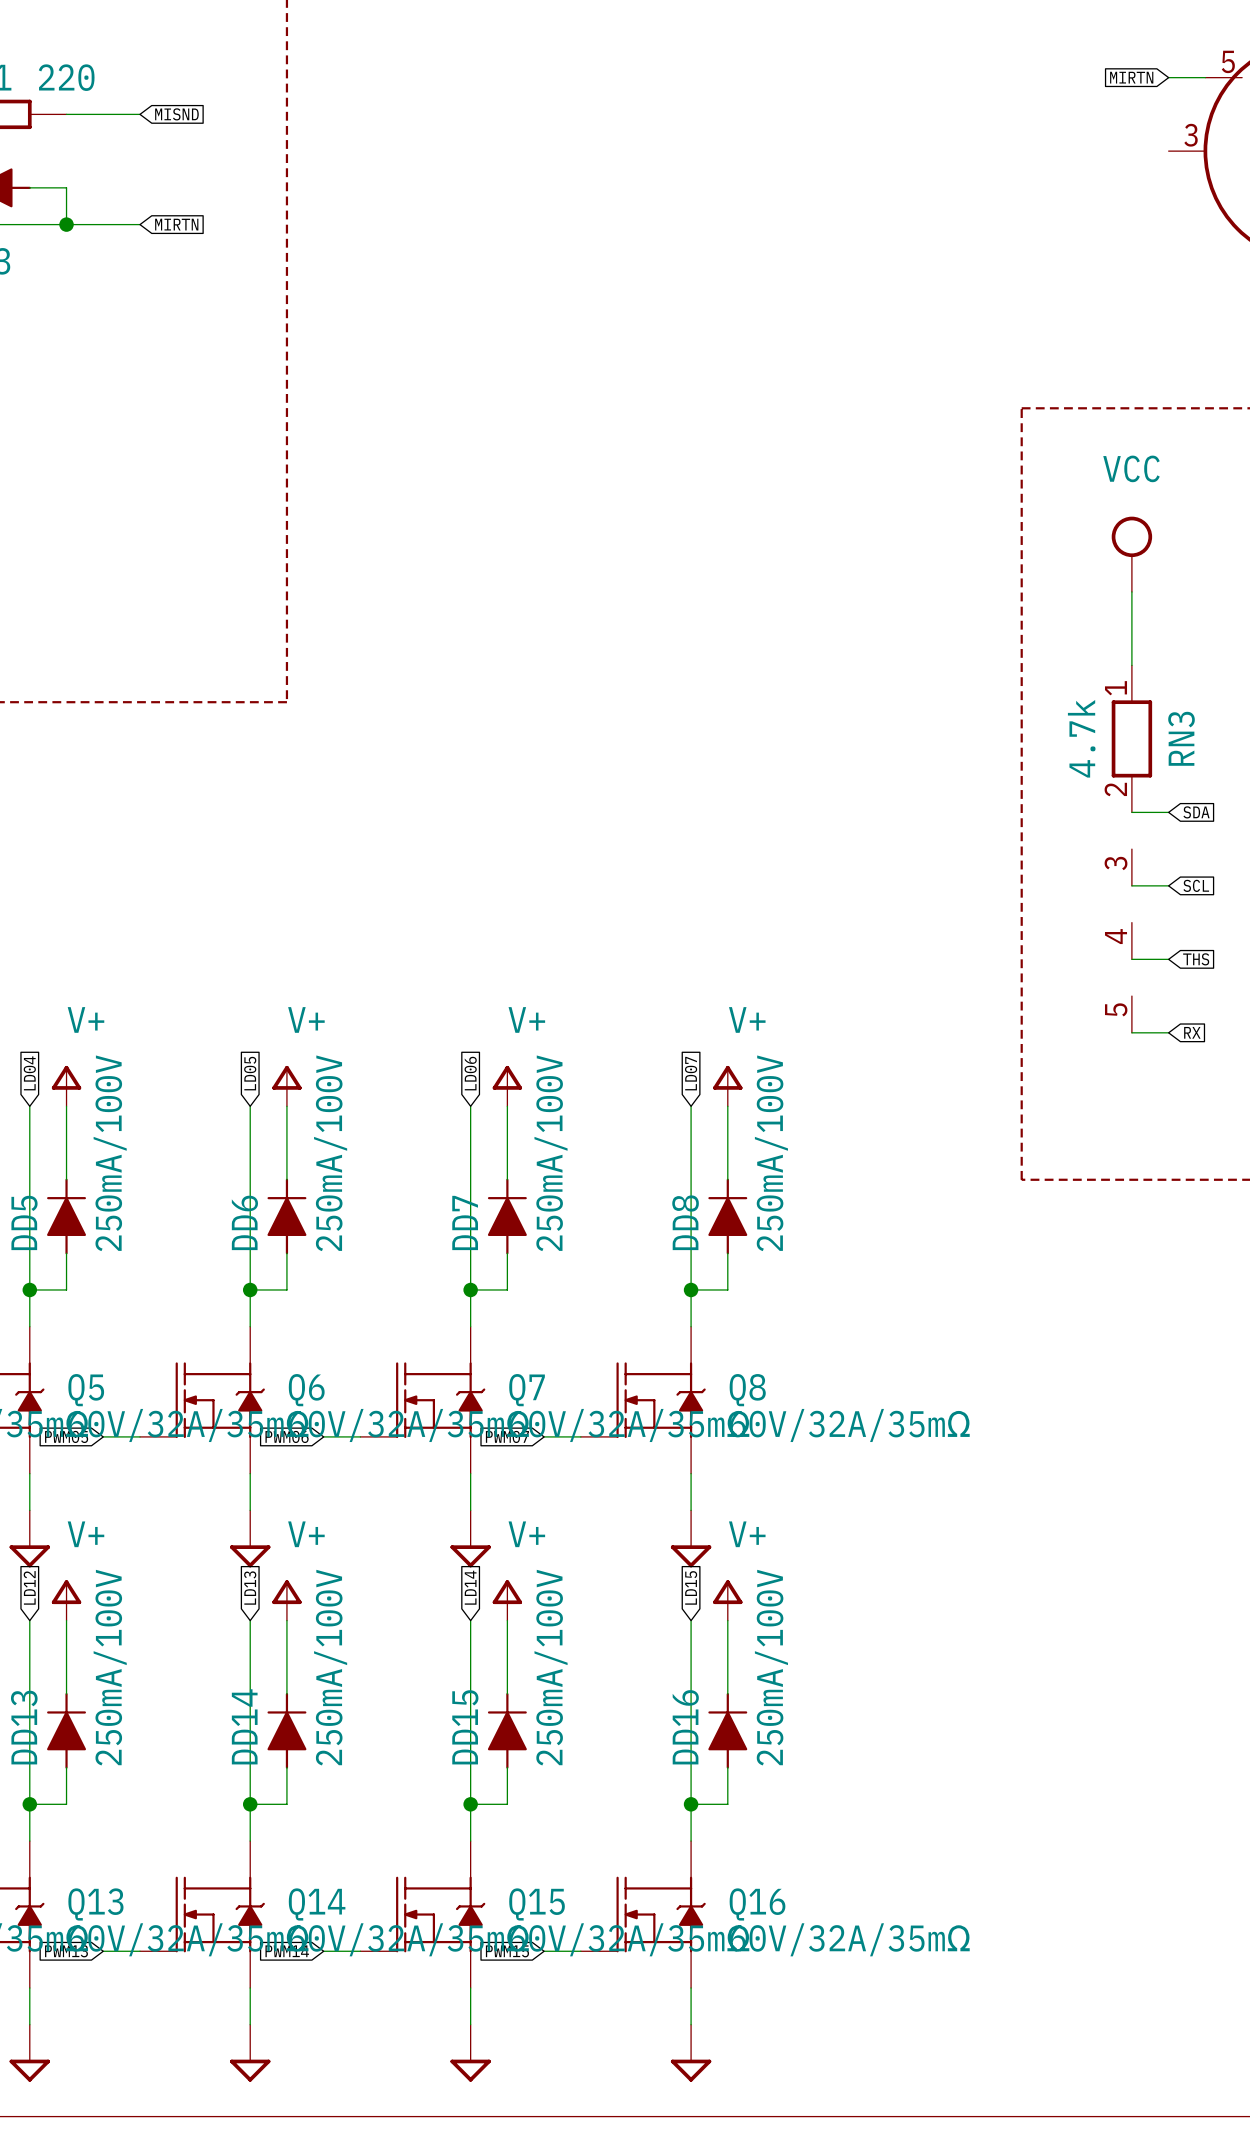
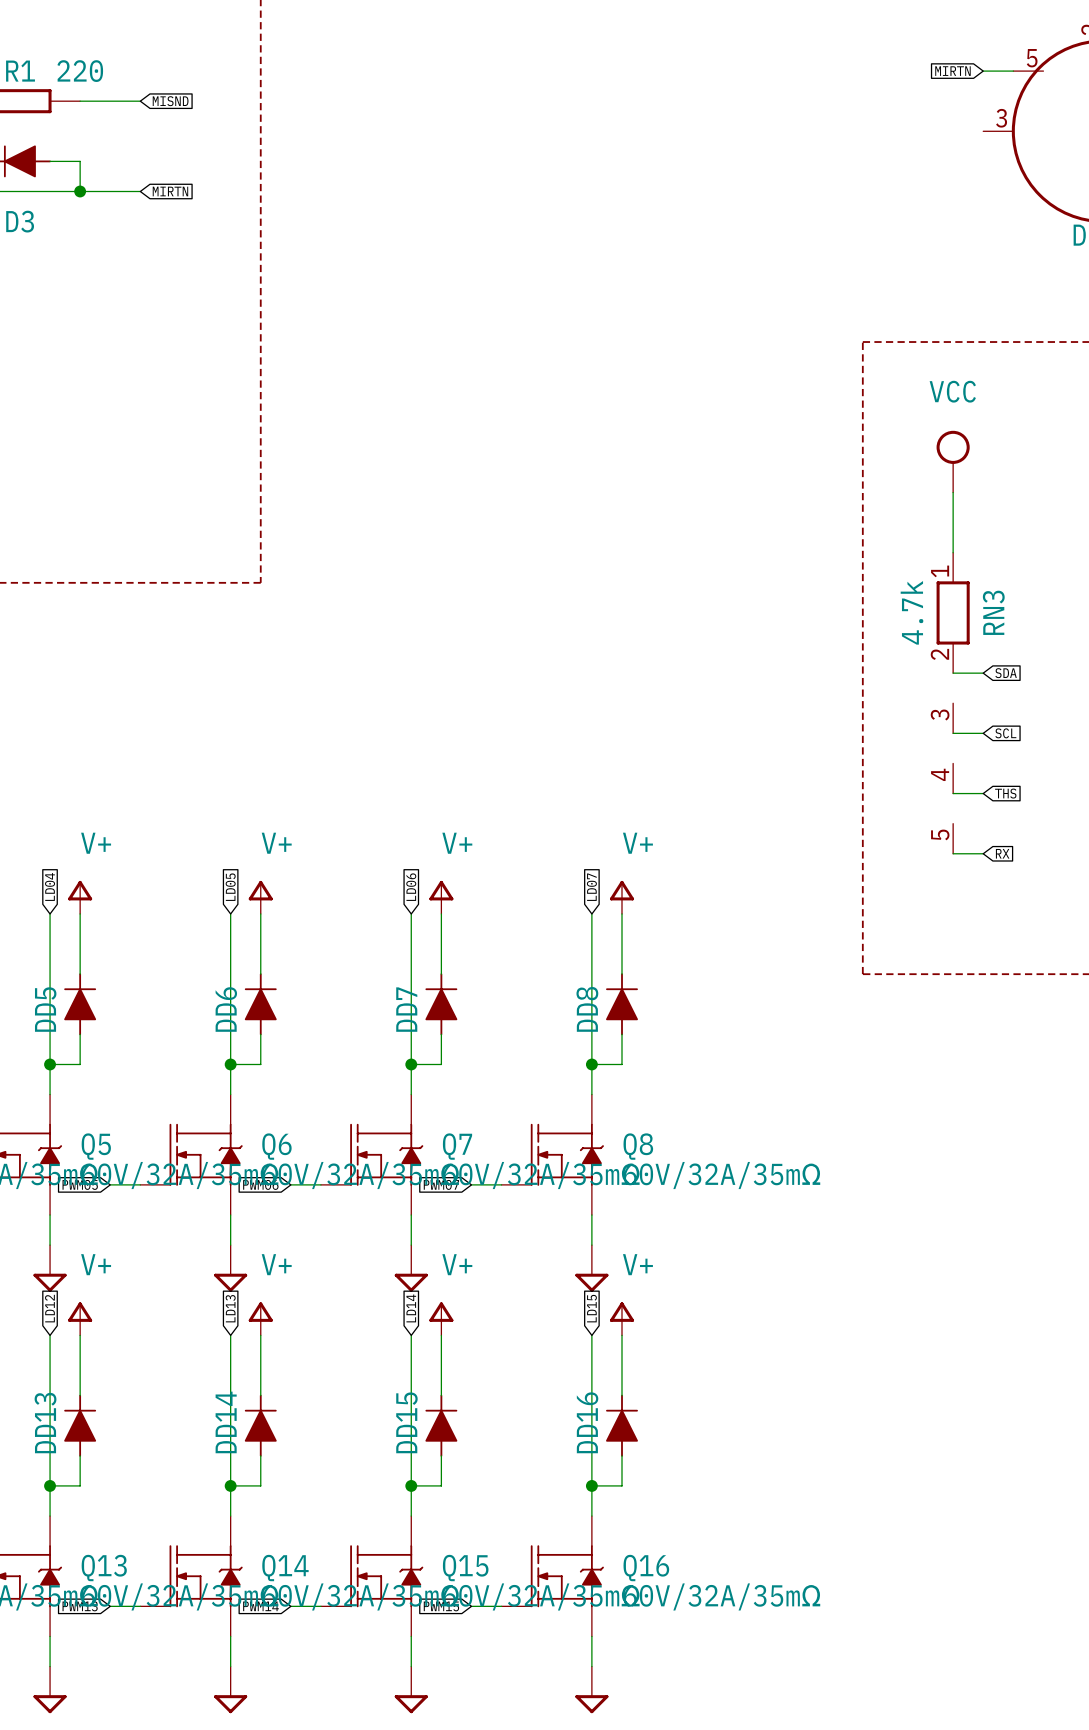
DD5 value: 250mA/100V (110, 1153) -> none
DD6 value: 250mA/100V (330, 1153) -> none
DD7 value: 250mA/100V (551, 1153) -> none
DD8 value: 250mA/100V (771, 1153) -> none
DD13 value: 250mA/100V (110, 1667) -> none
DD14 value: 250mA/100V (330, 1667) -> none
DD15 value: 250mA/100V (551, 1667) -> none
DD16 value: 250mA/100V (771, 1667) -> none

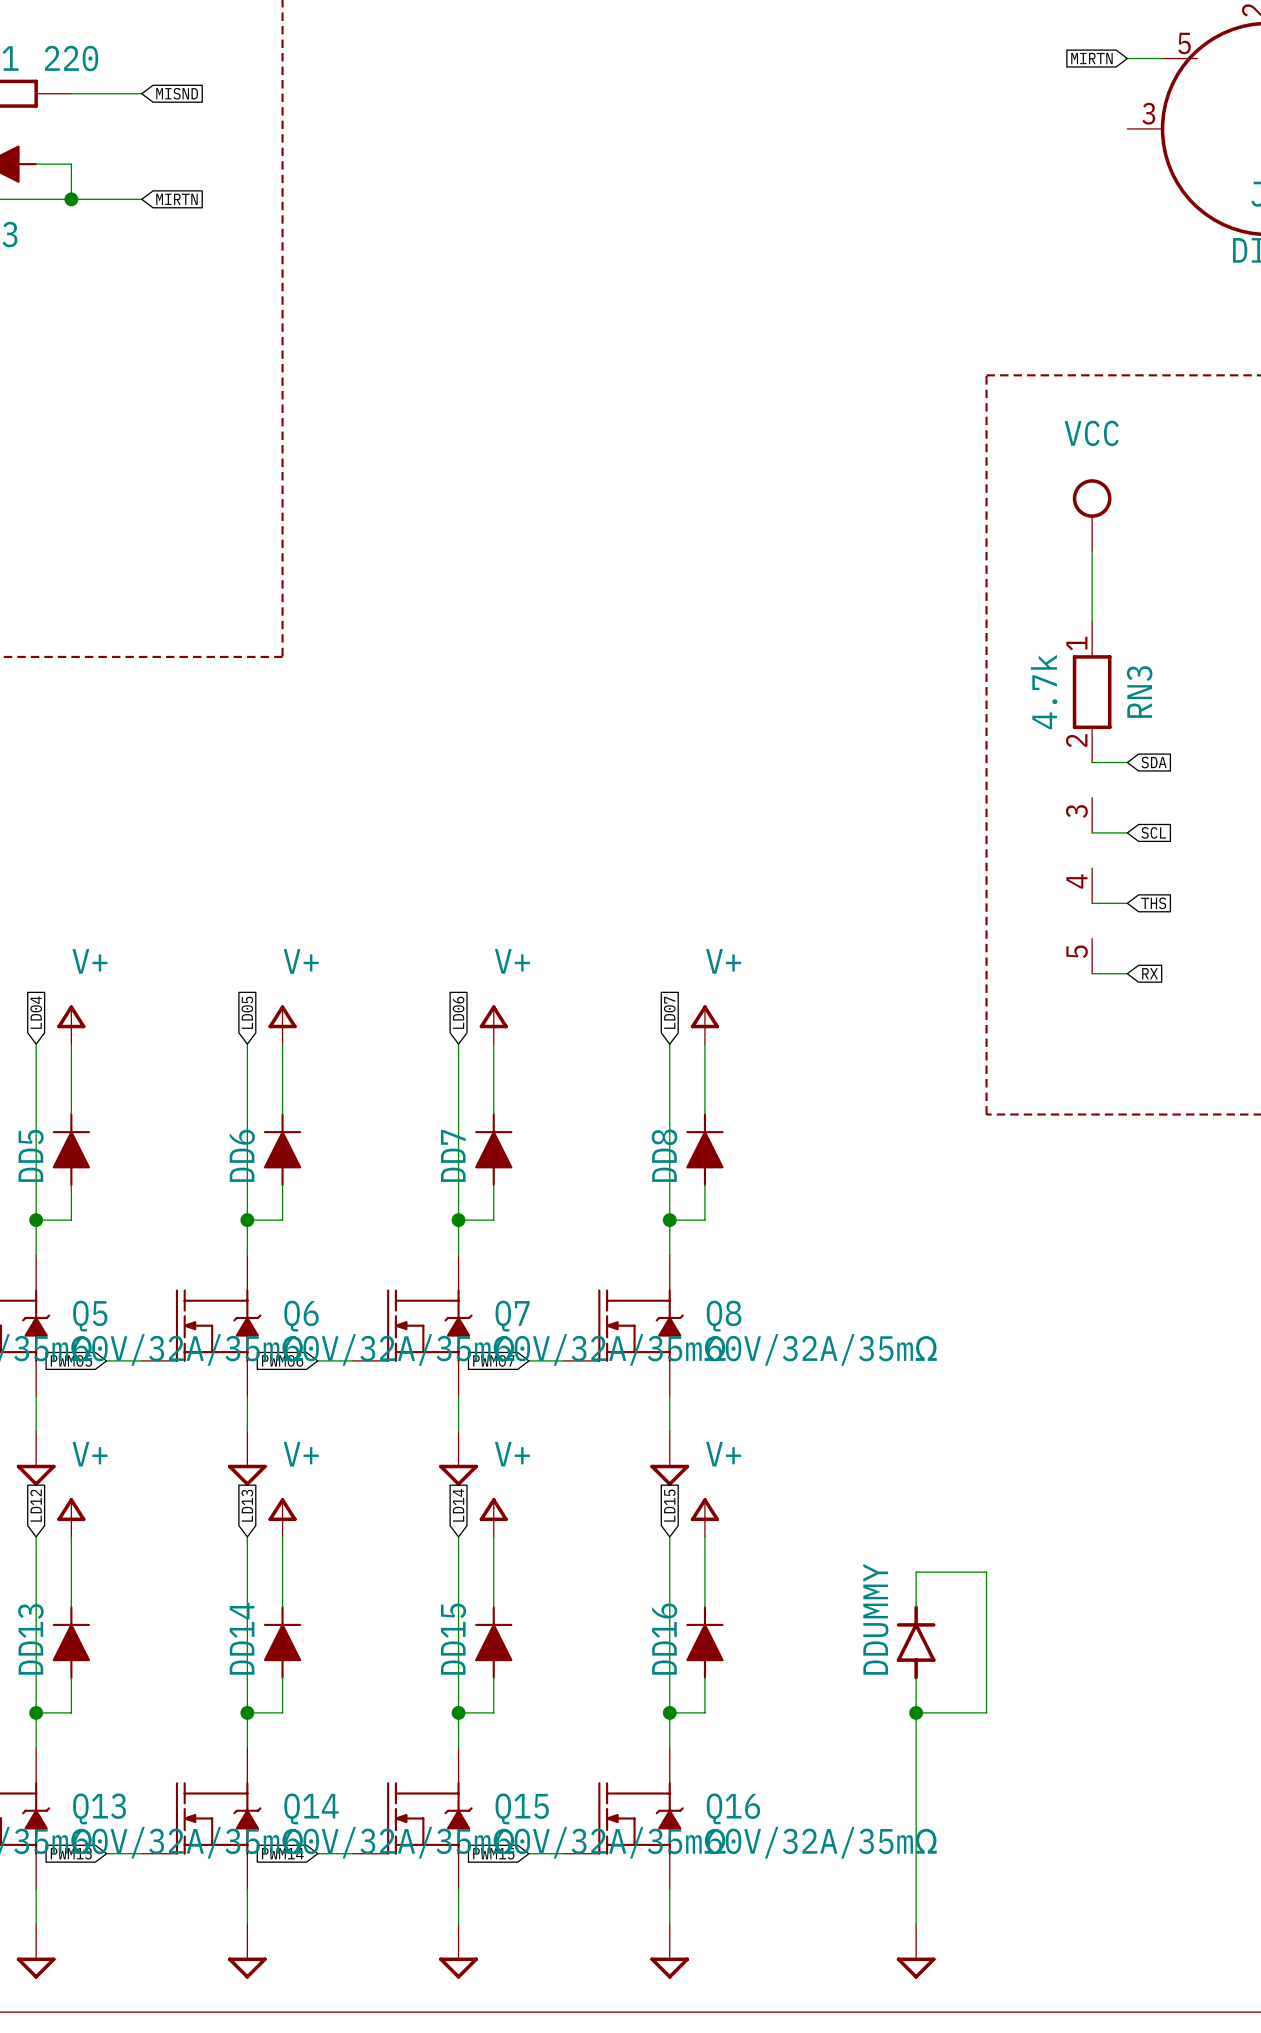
wire: none -> (916, 1607) (916, 1572) (986, 1572) (986, 1712) (916, 1712)
DDUMMY: none -> (916, 1642)
wire: none -> (916, 1677) (916, 1924)
junction: none -> (916, 1712)
power symbol: none -> (916, 1951)

